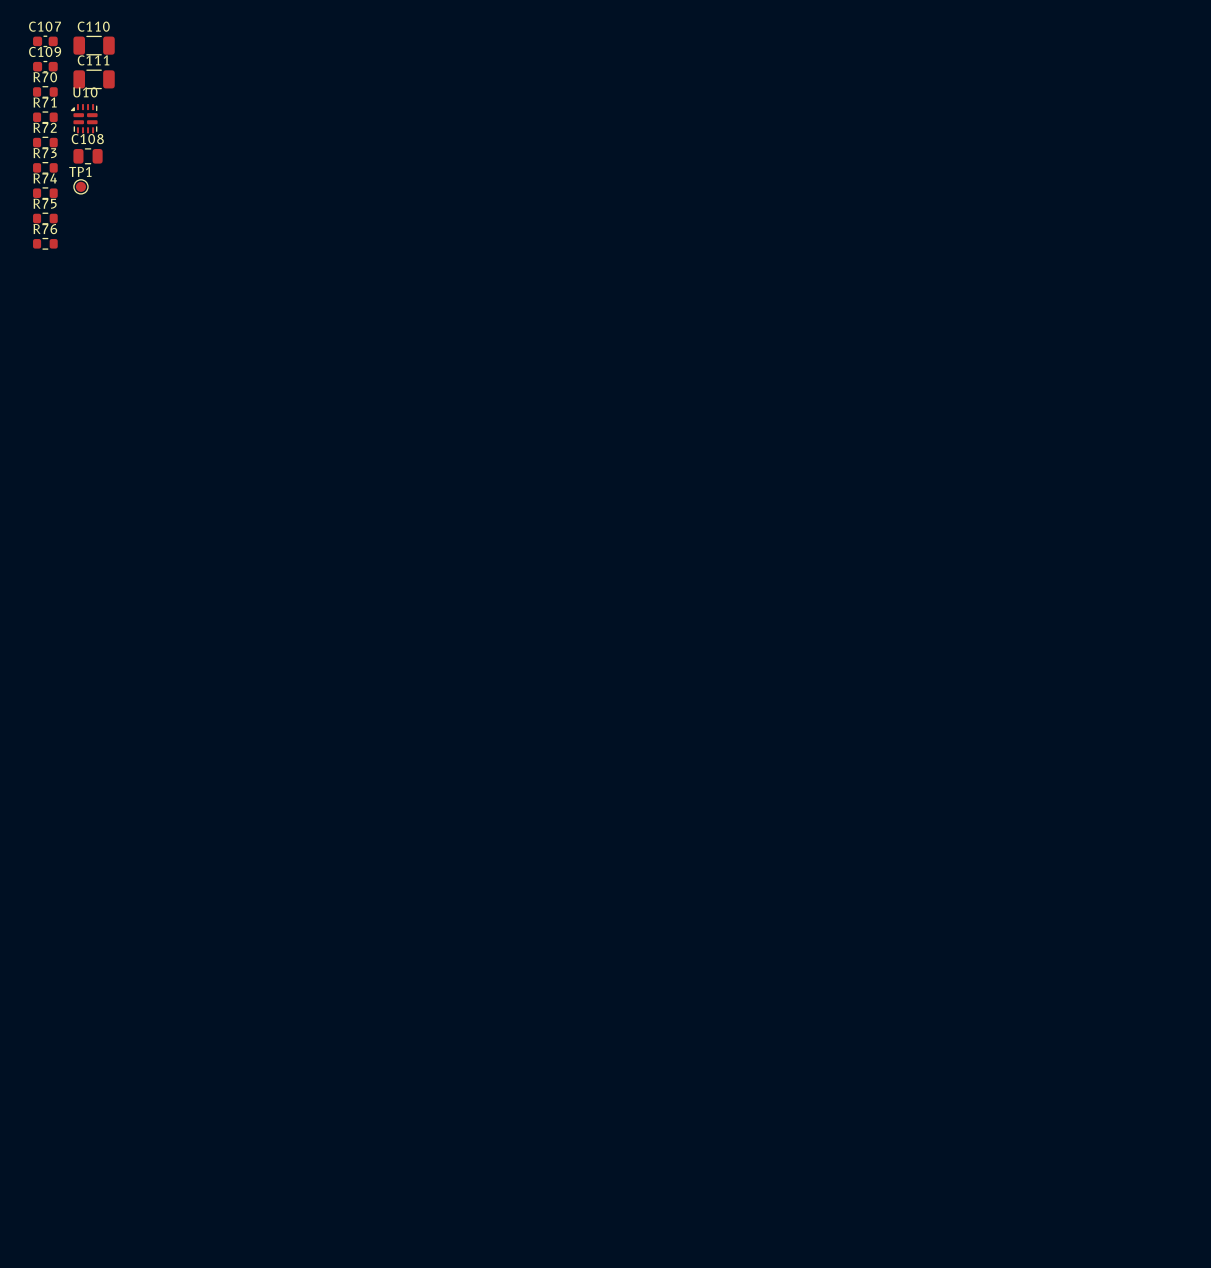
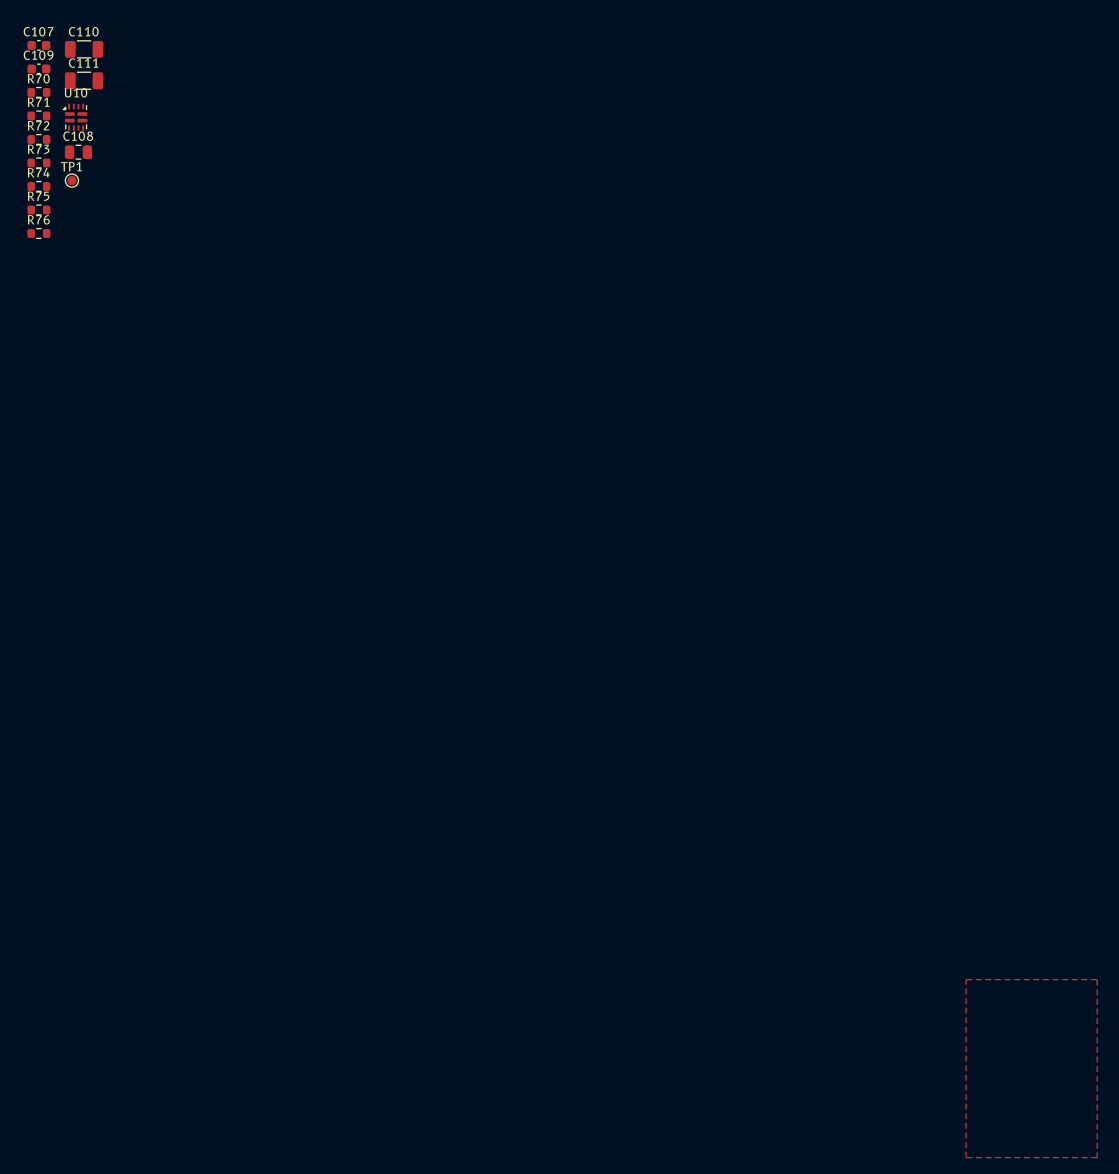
zone outline: none -> (966, 979) (1097, 979) (1097, 1157) (966, 1157) (966, 979)

